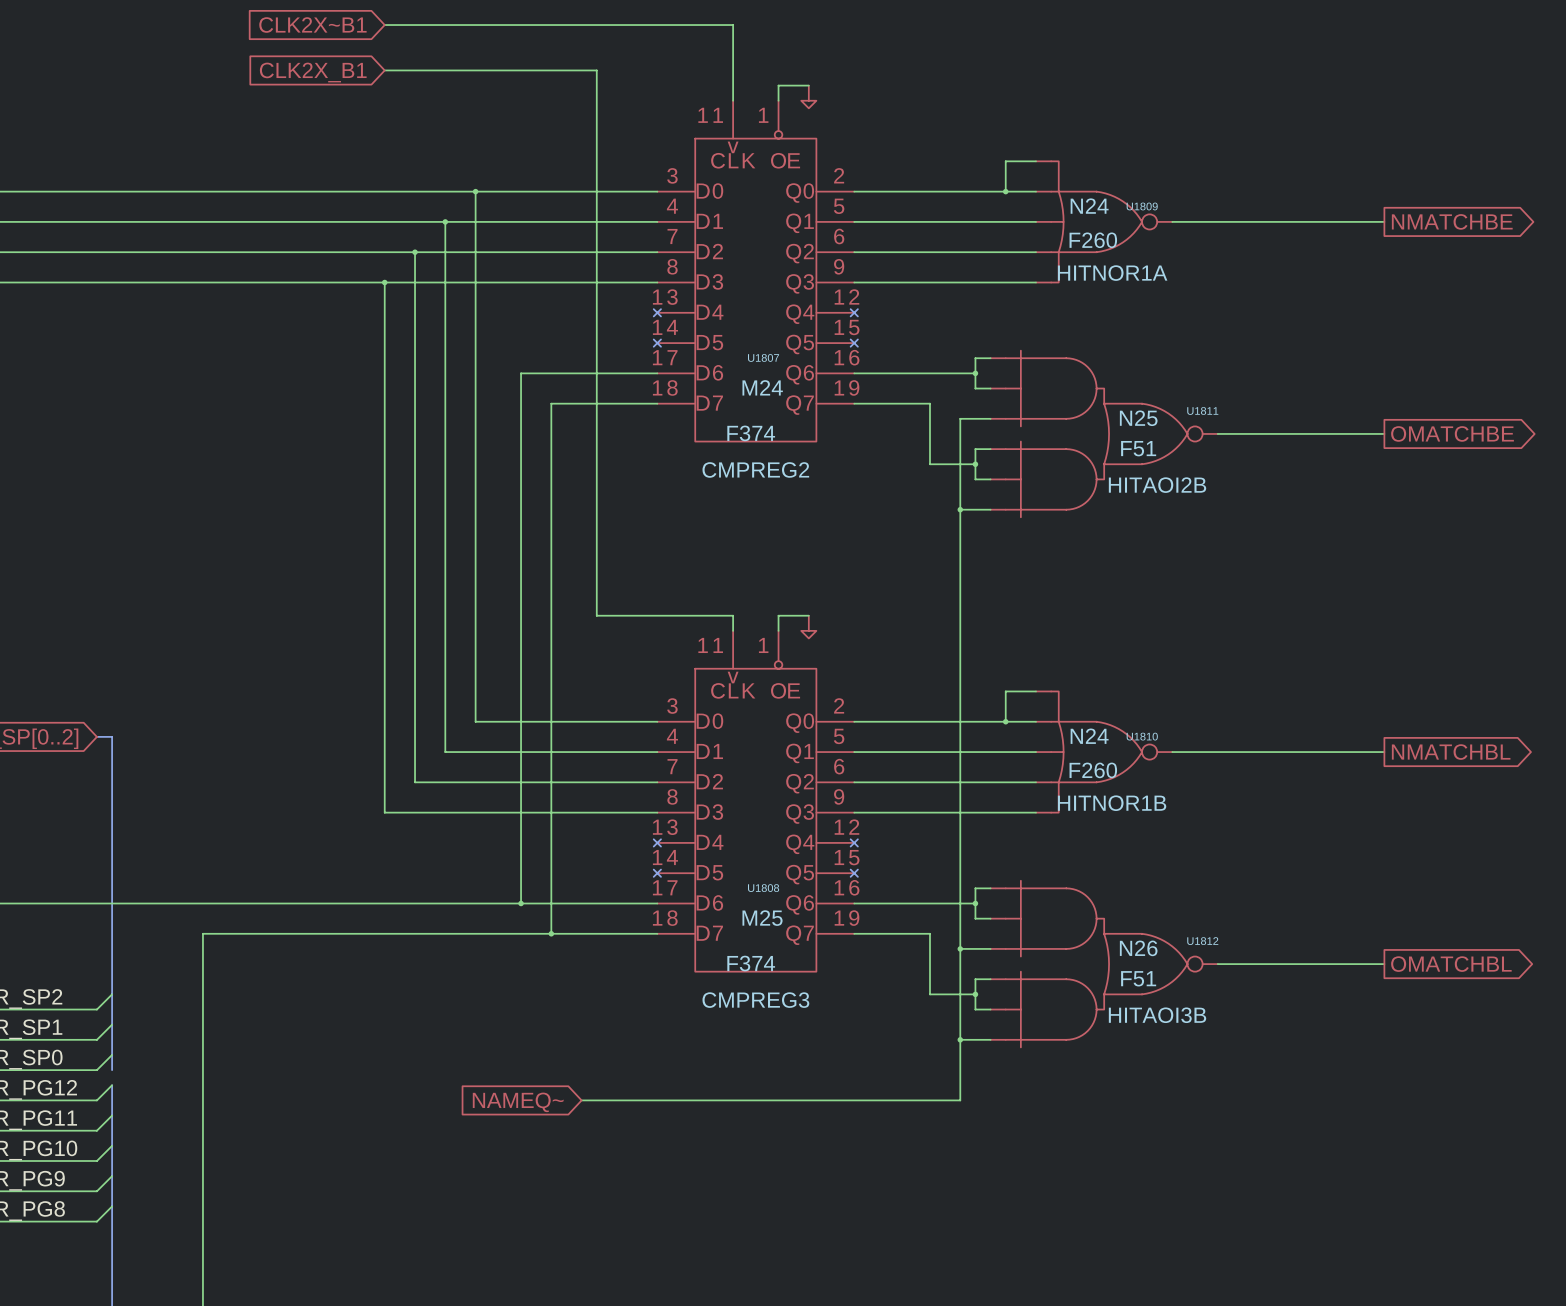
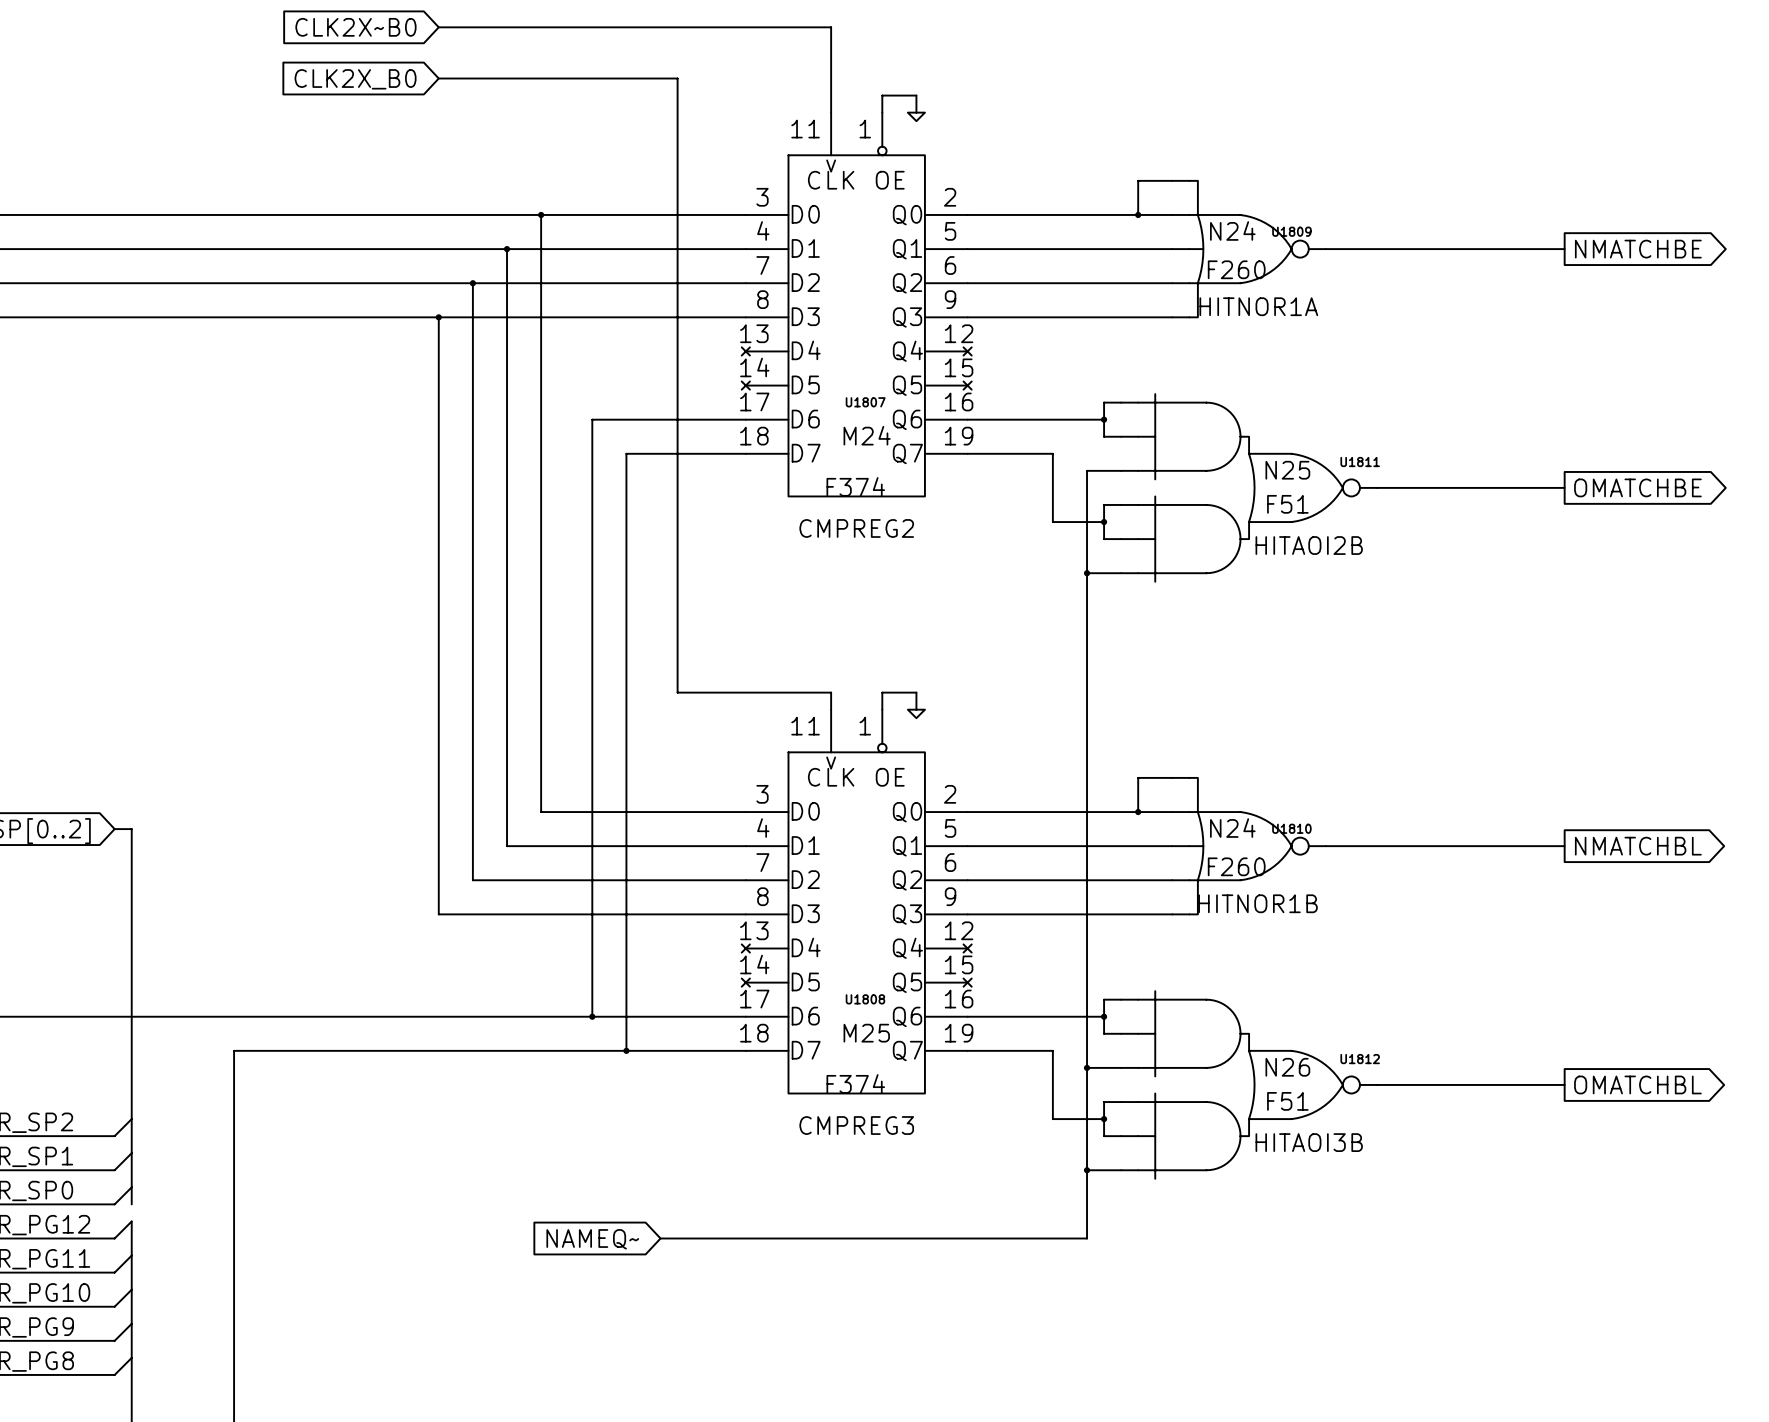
global label: CLK2X~B1 (312, 25) -> CLK2X~B0 (355, 27)
global label: CLK2X_B1 (313, 72) -> CLK2X_B0 (355, 79)

